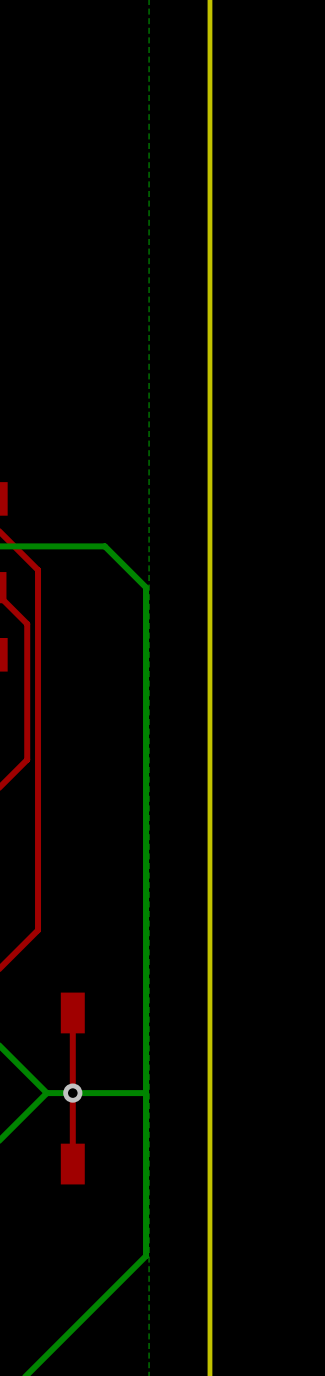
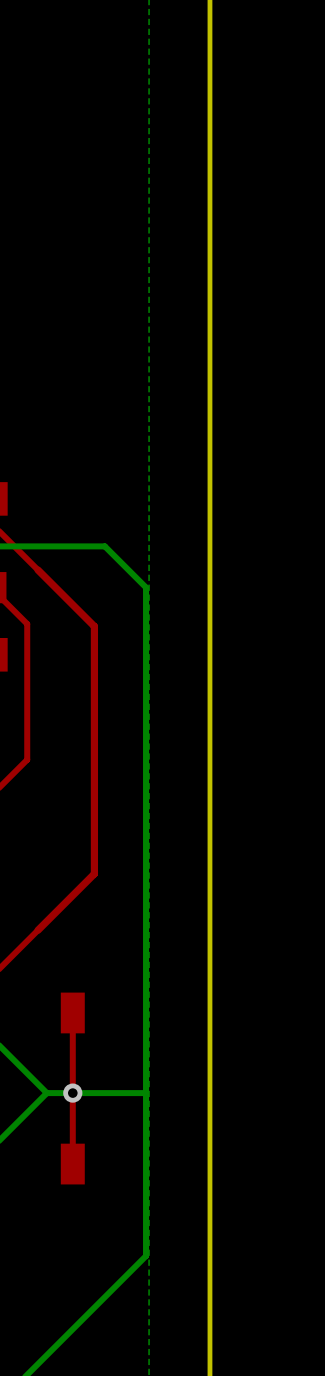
top track: (38, 570) (38, 930) -> (38, 570) (94, 626) (94, 873) (38, 930)

